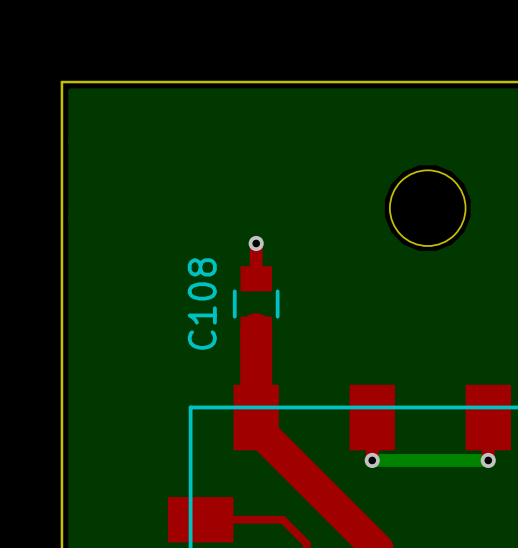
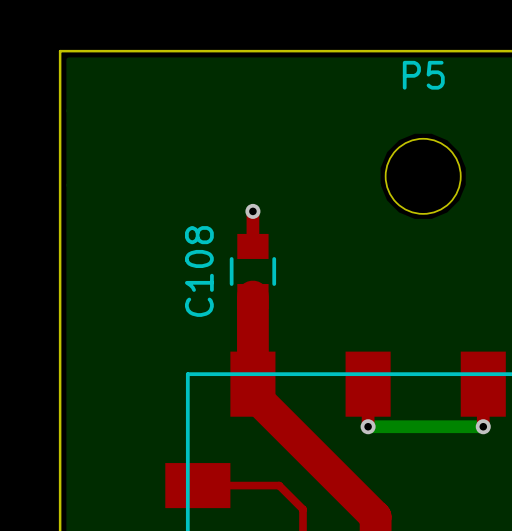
P5 name: none -> P5 (423, 75)

